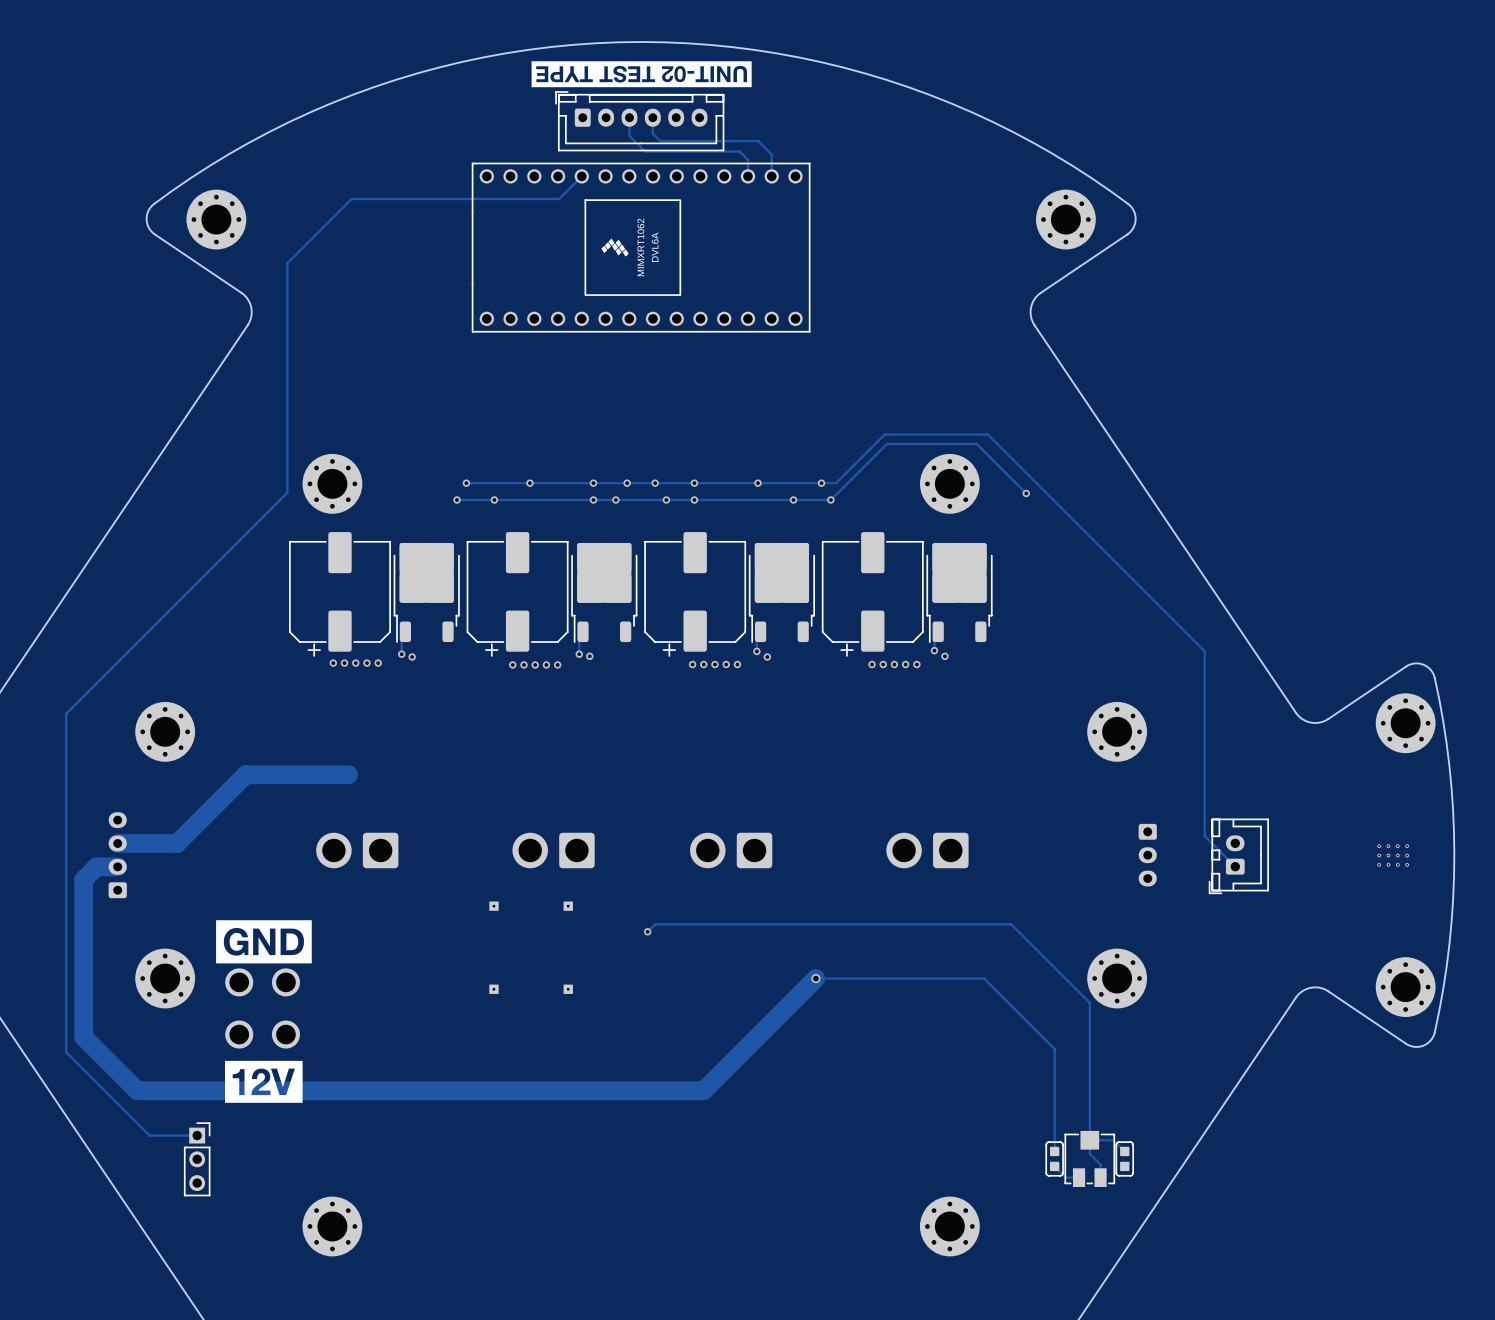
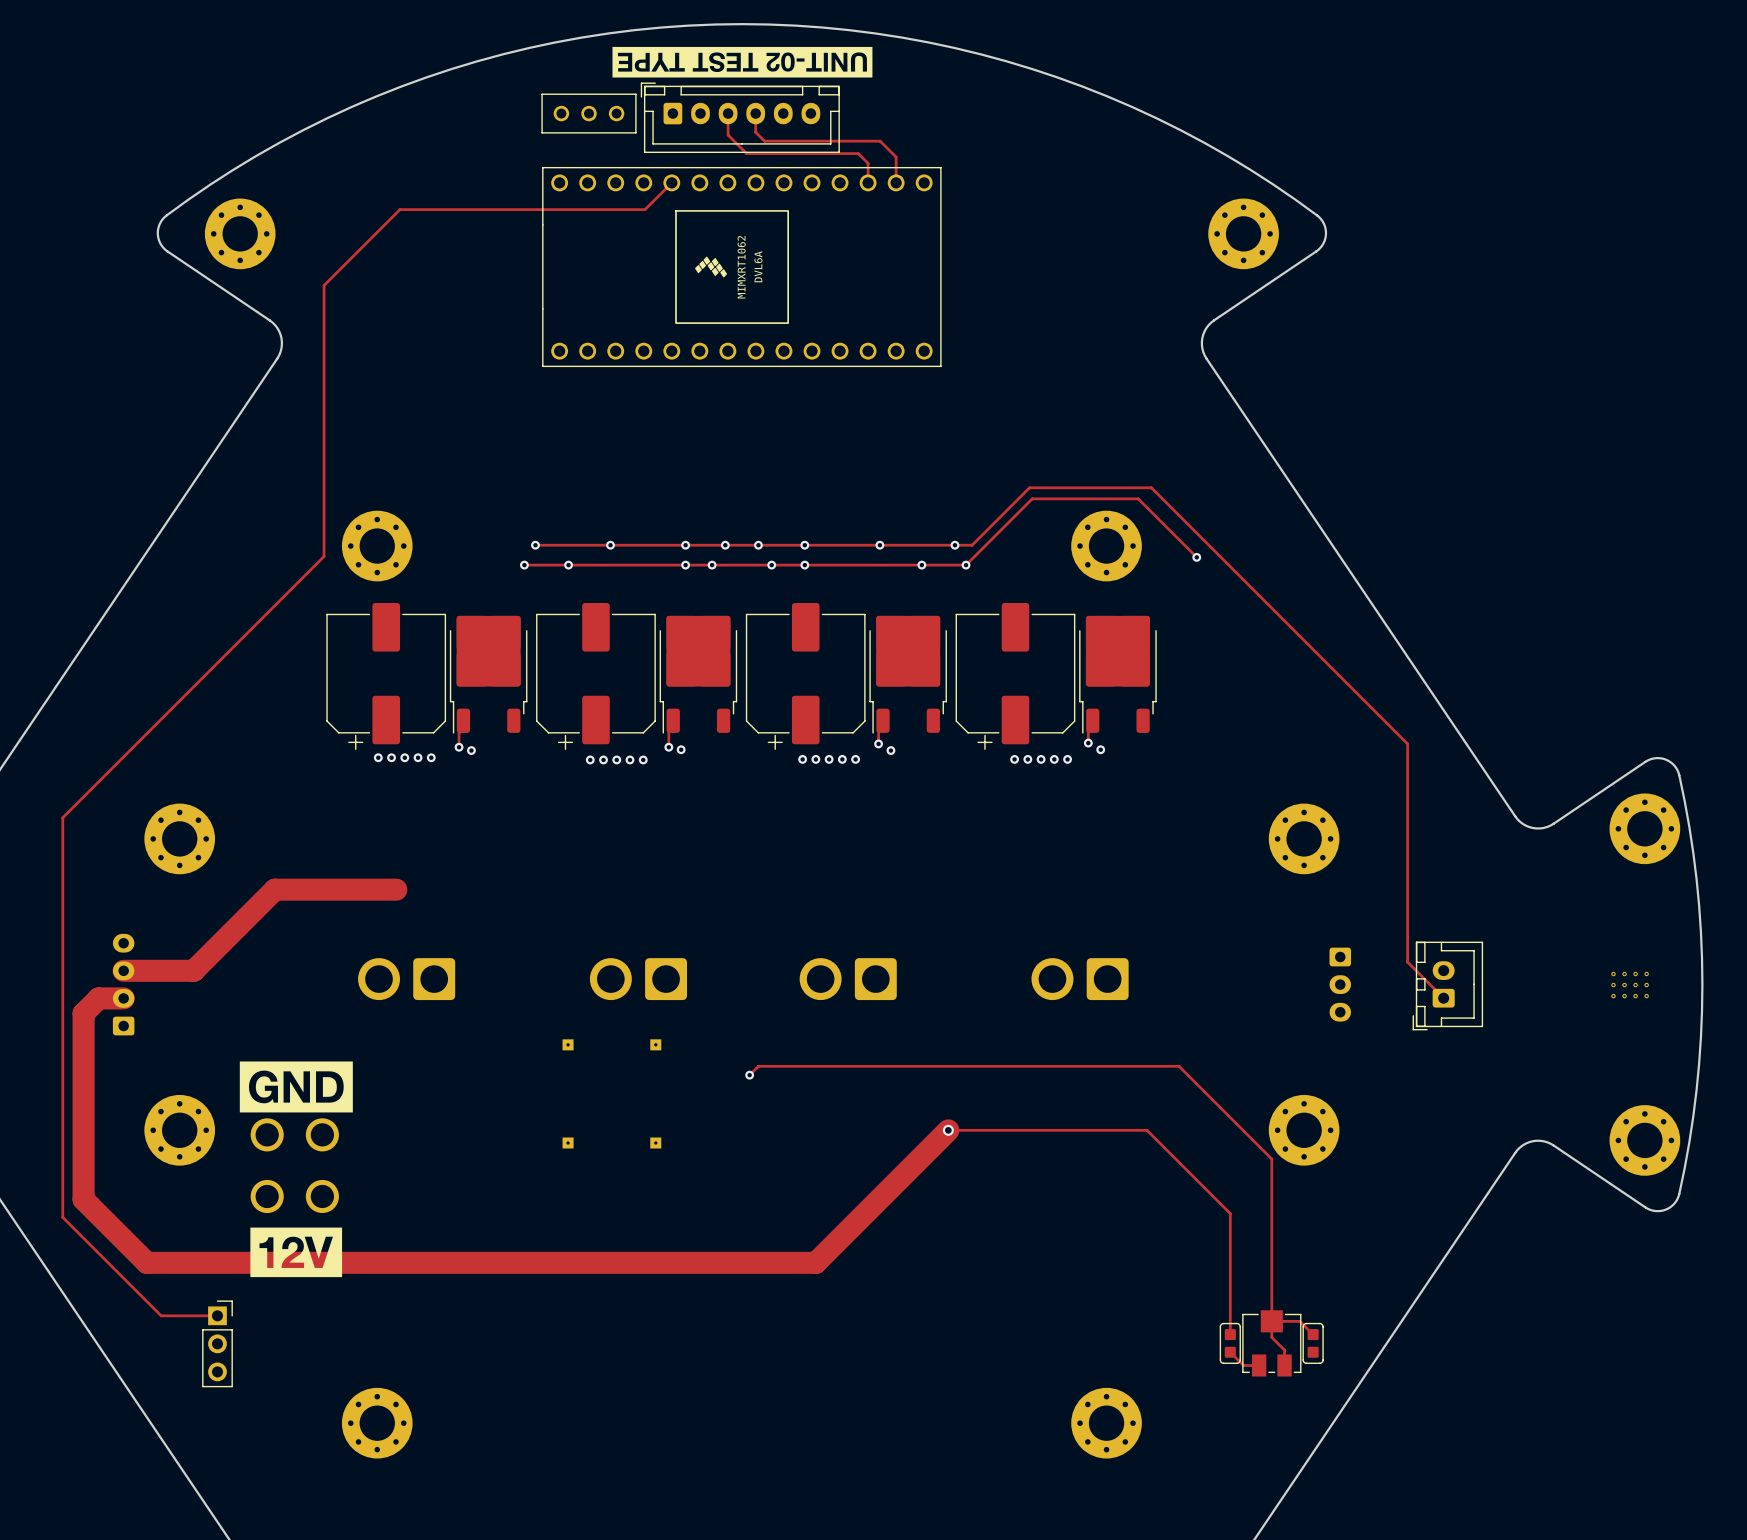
part: none -> (589, 113)

